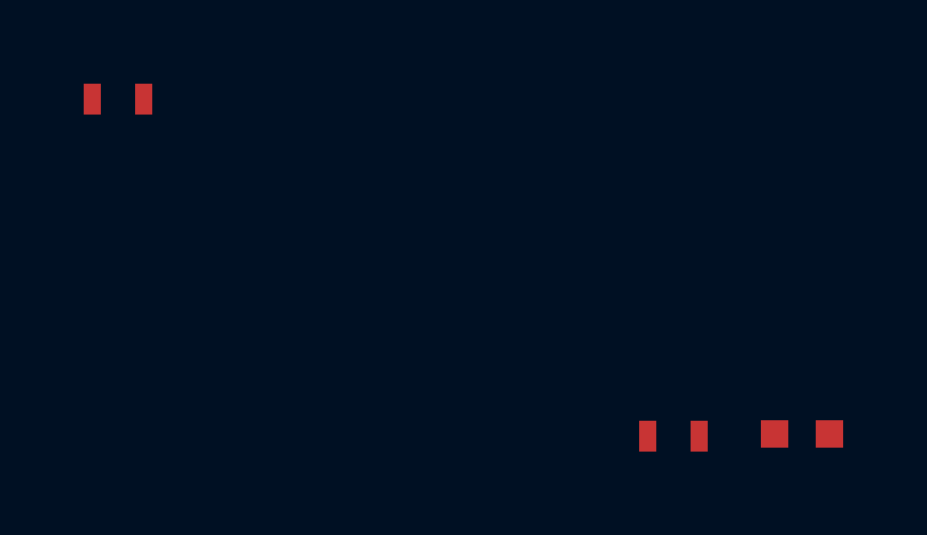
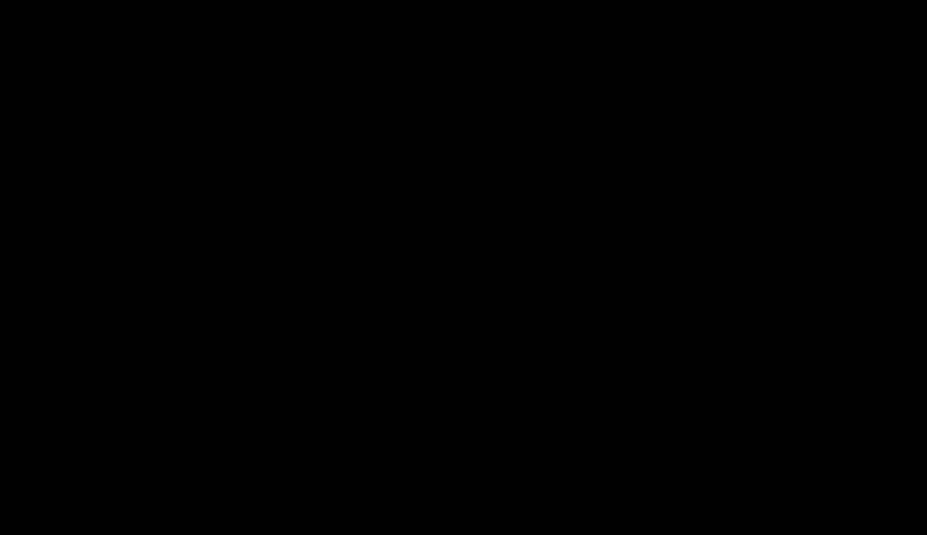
part: (117, 99) -> none
part: (802, 433) -> none
part: (673, 436) -> none

